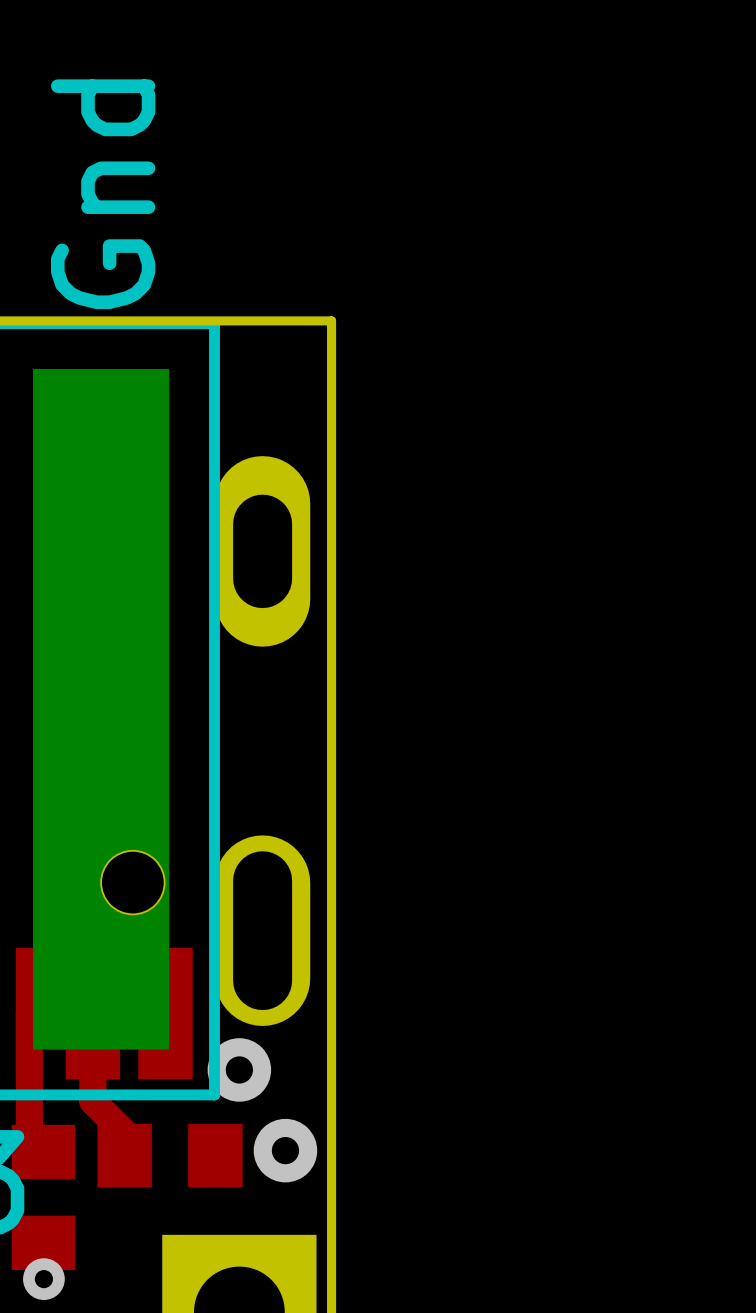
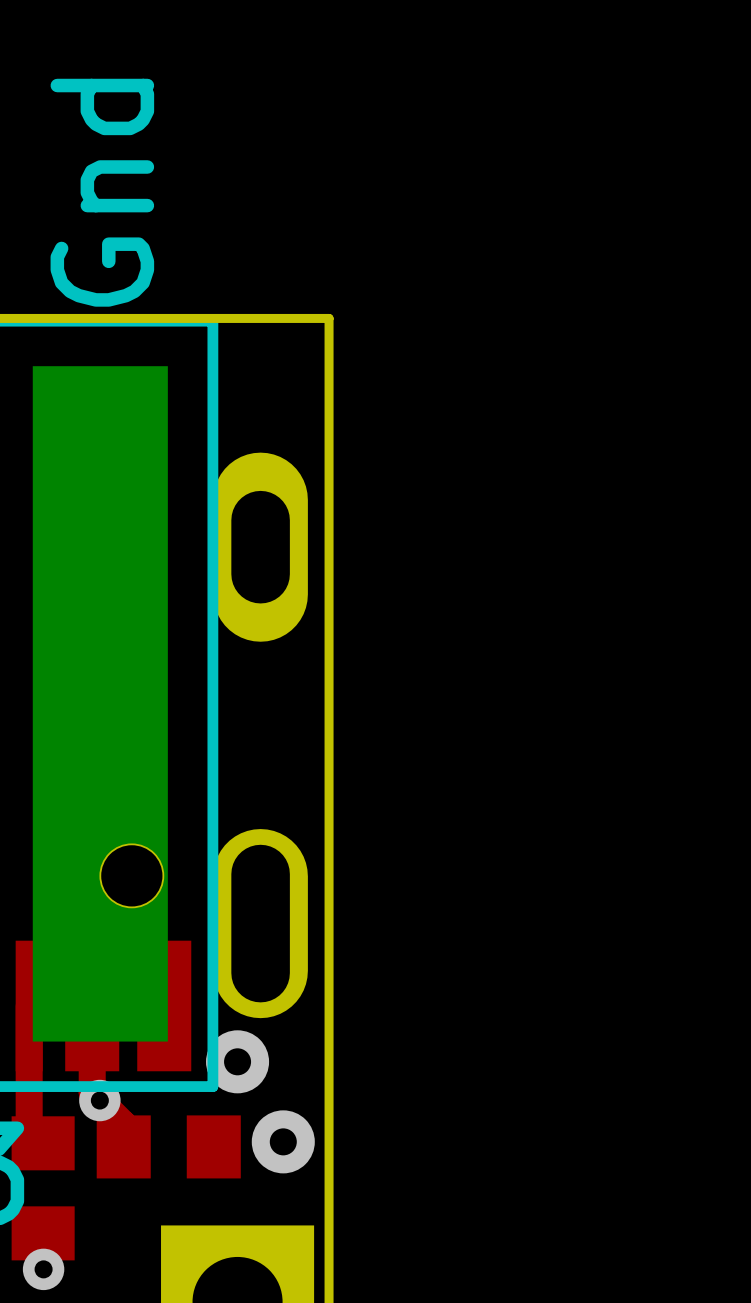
via: none -> (99, 1100)

